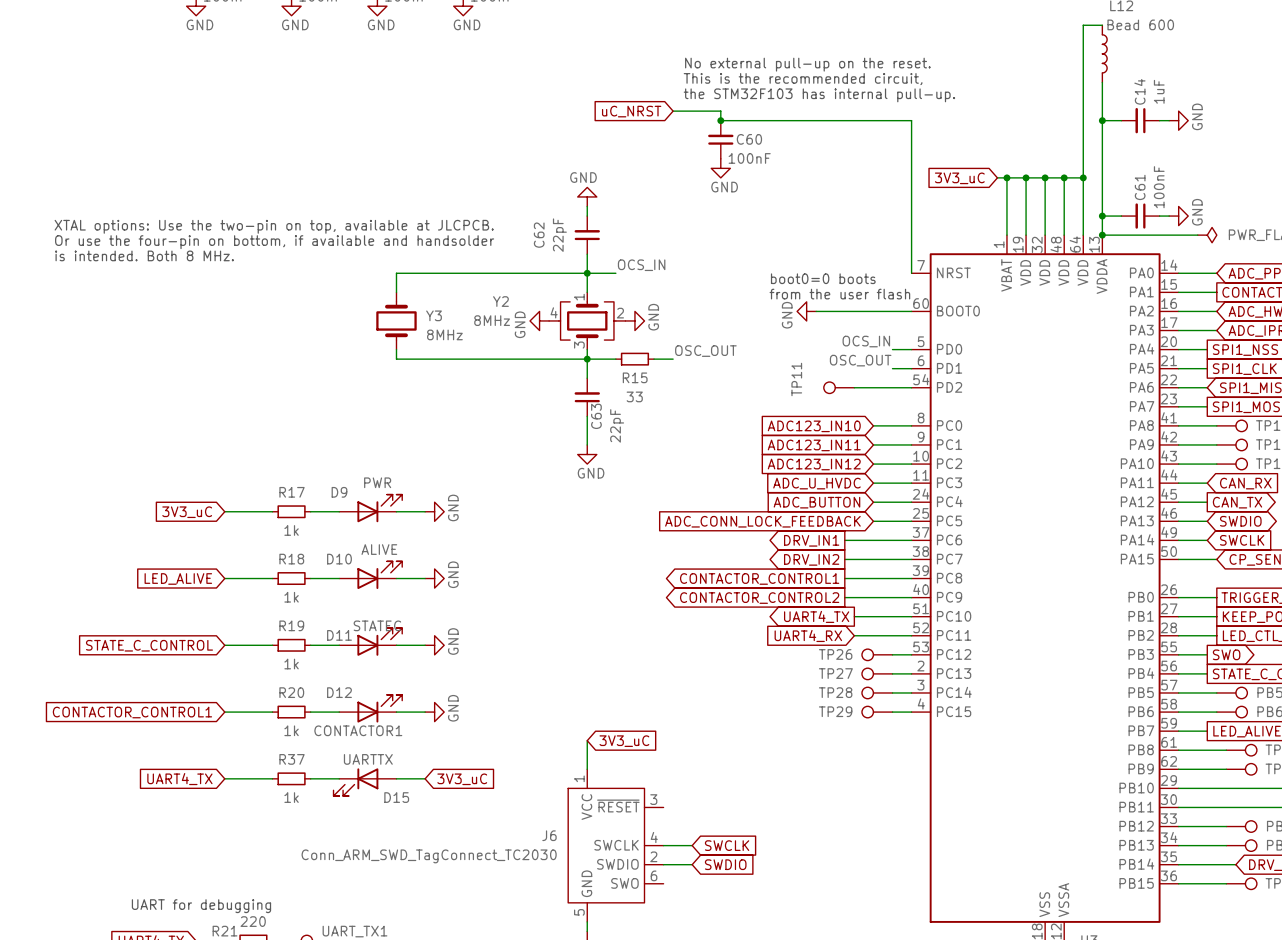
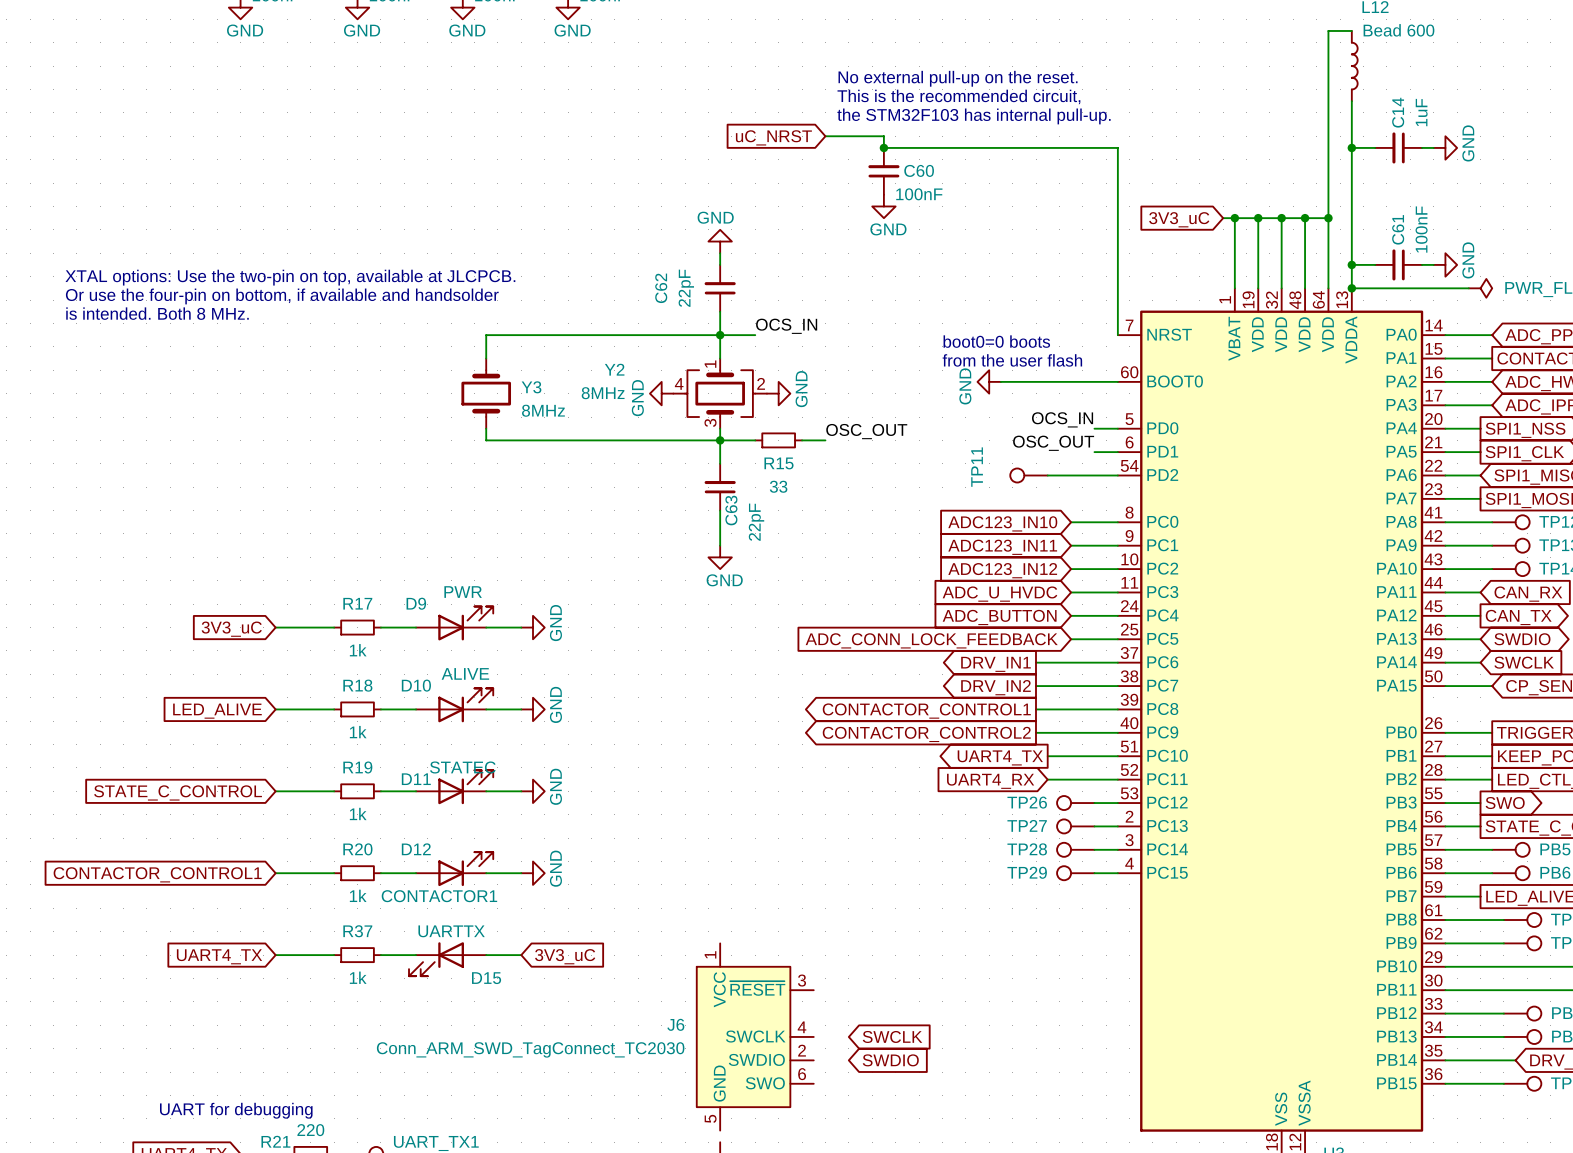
wire: (587, 740) (587, 769) -> none
global label: 3V3_uC (624, 741) -> none
wire: (663, 845) (692, 845) -> none
wire: (663, 864) (692, 864) -> none
wire: (587, 921) (587, 931) -> none

